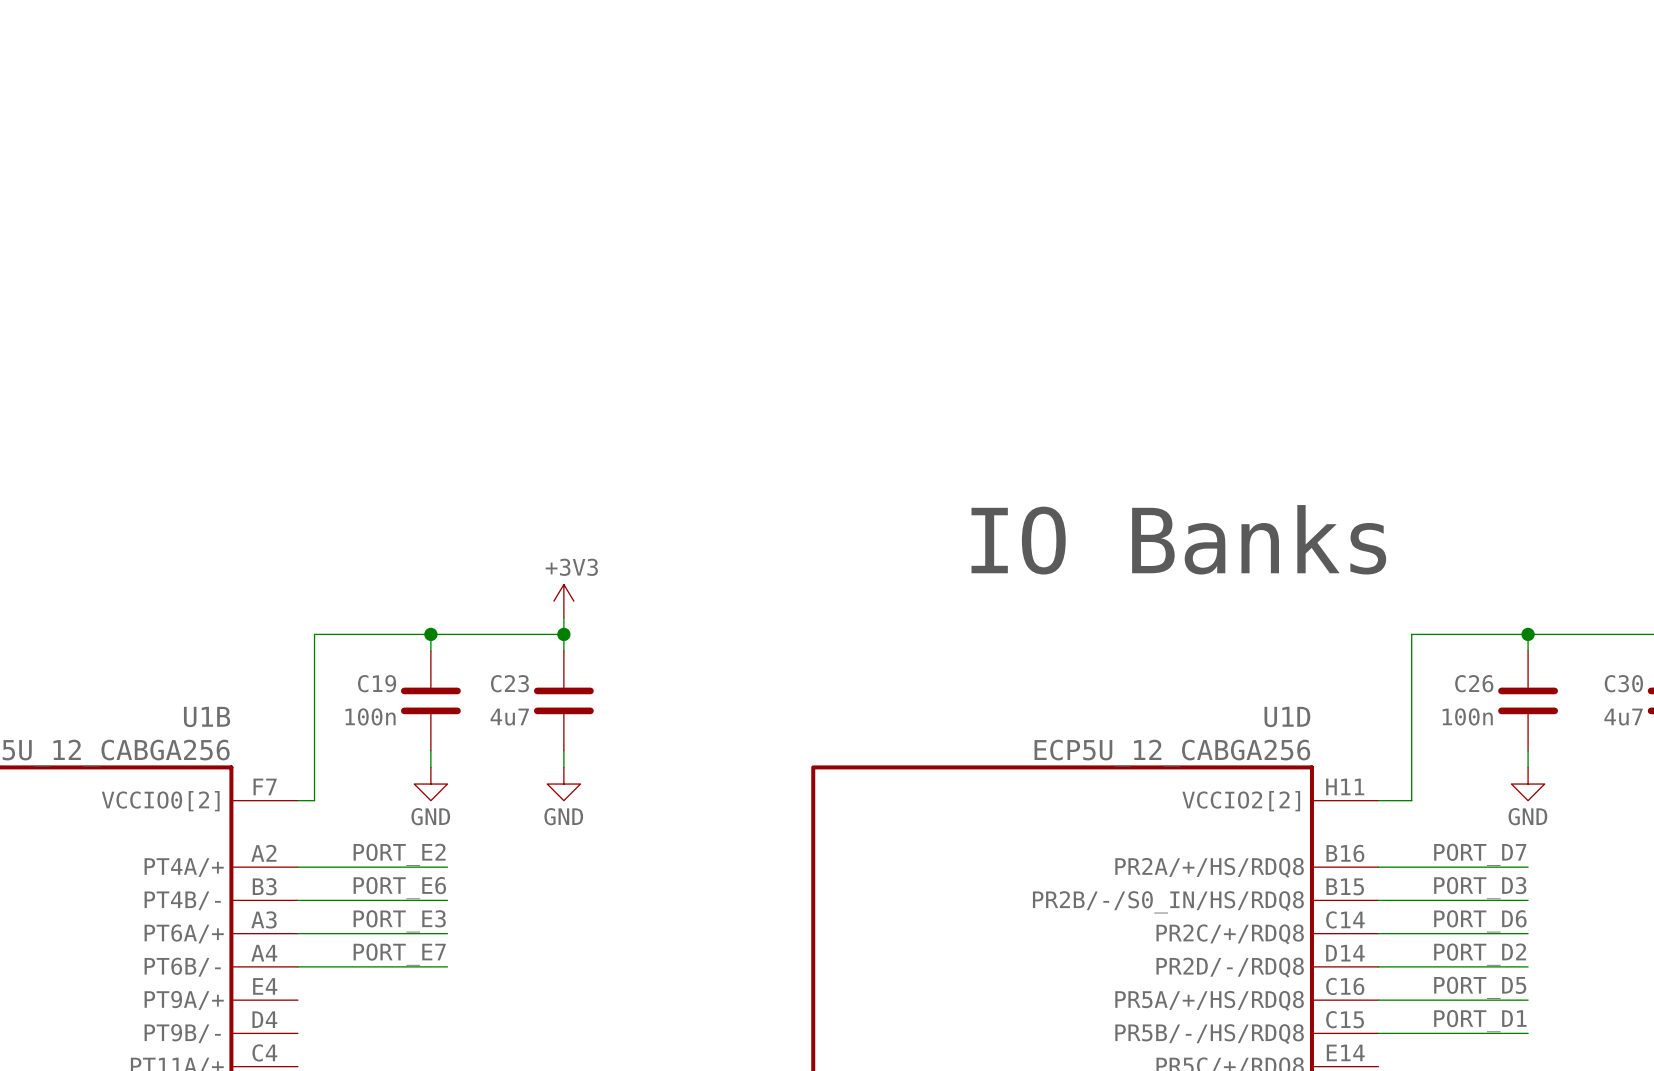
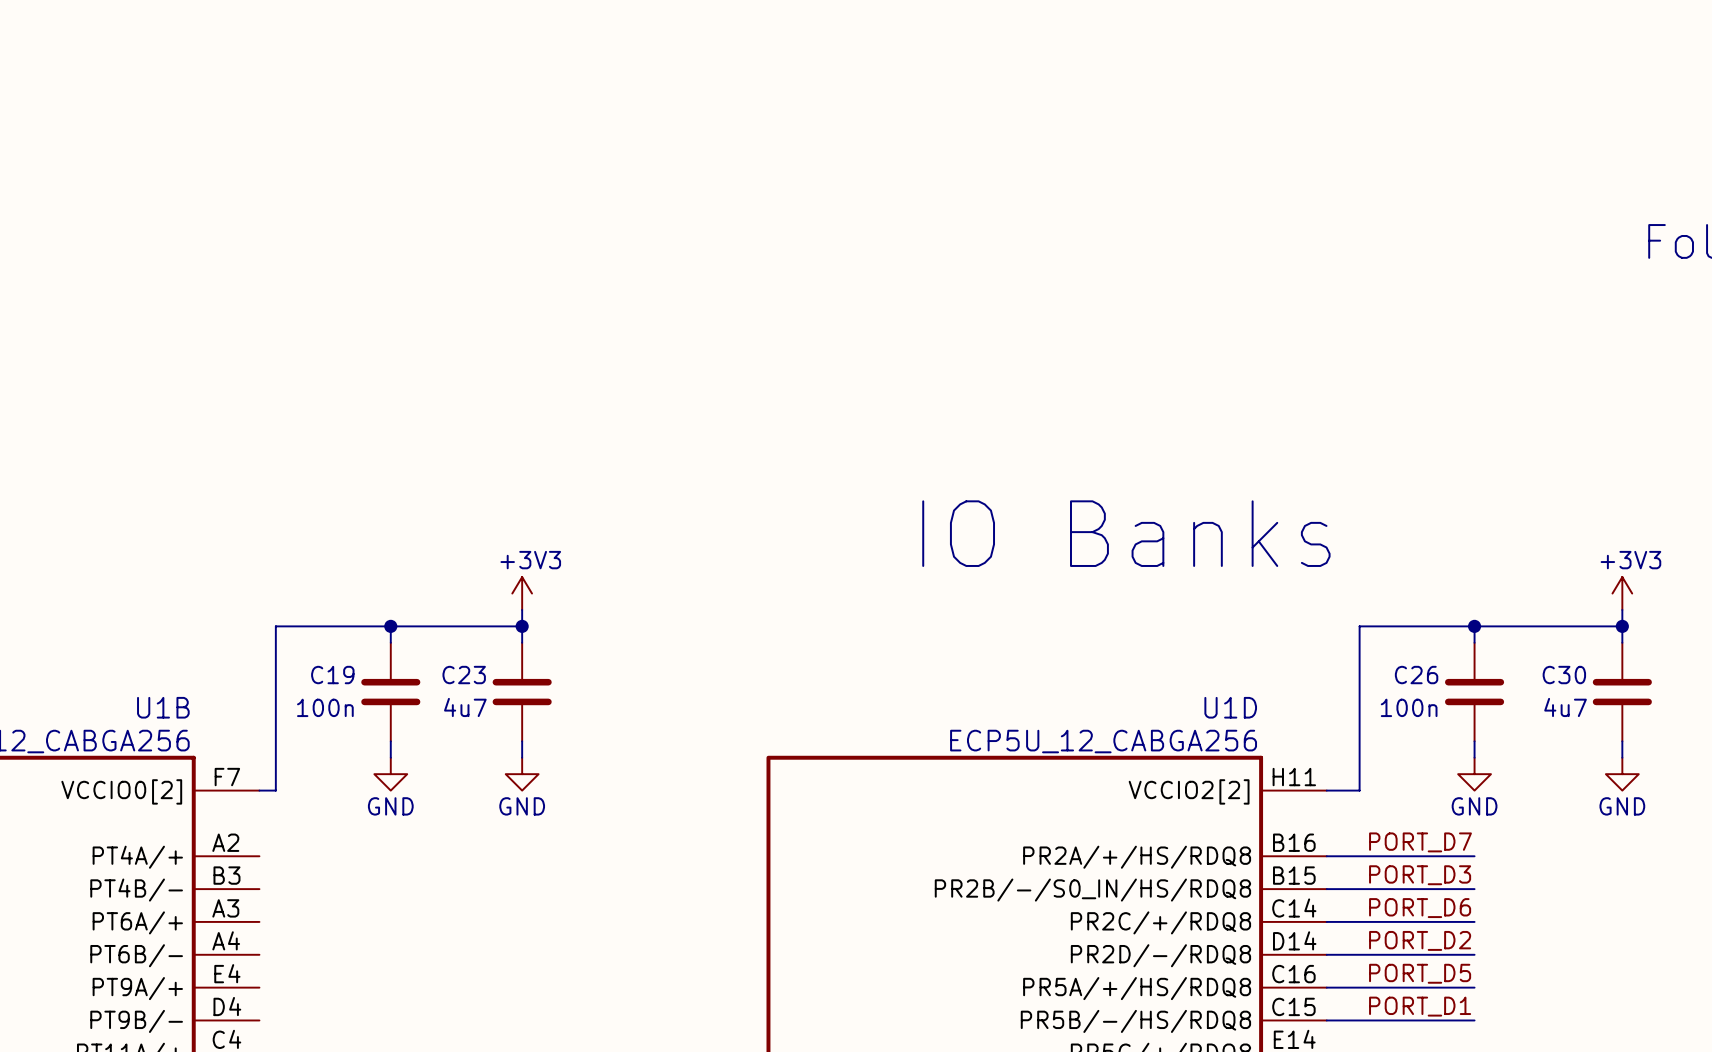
label: PORT_E2 (399, 854) -> none
wire: (297, 867) (447, 867) -> none
label: PORT_E6 (399, 888) -> none
wire: (297, 900) (447, 900) -> none
label: PORT_E3 (399, 921) -> none
wire: (297, 933) (447, 933) -> none
label: PORT_E7 (399, 954) -> none
wire: (297, 966) (447, 966) -> none

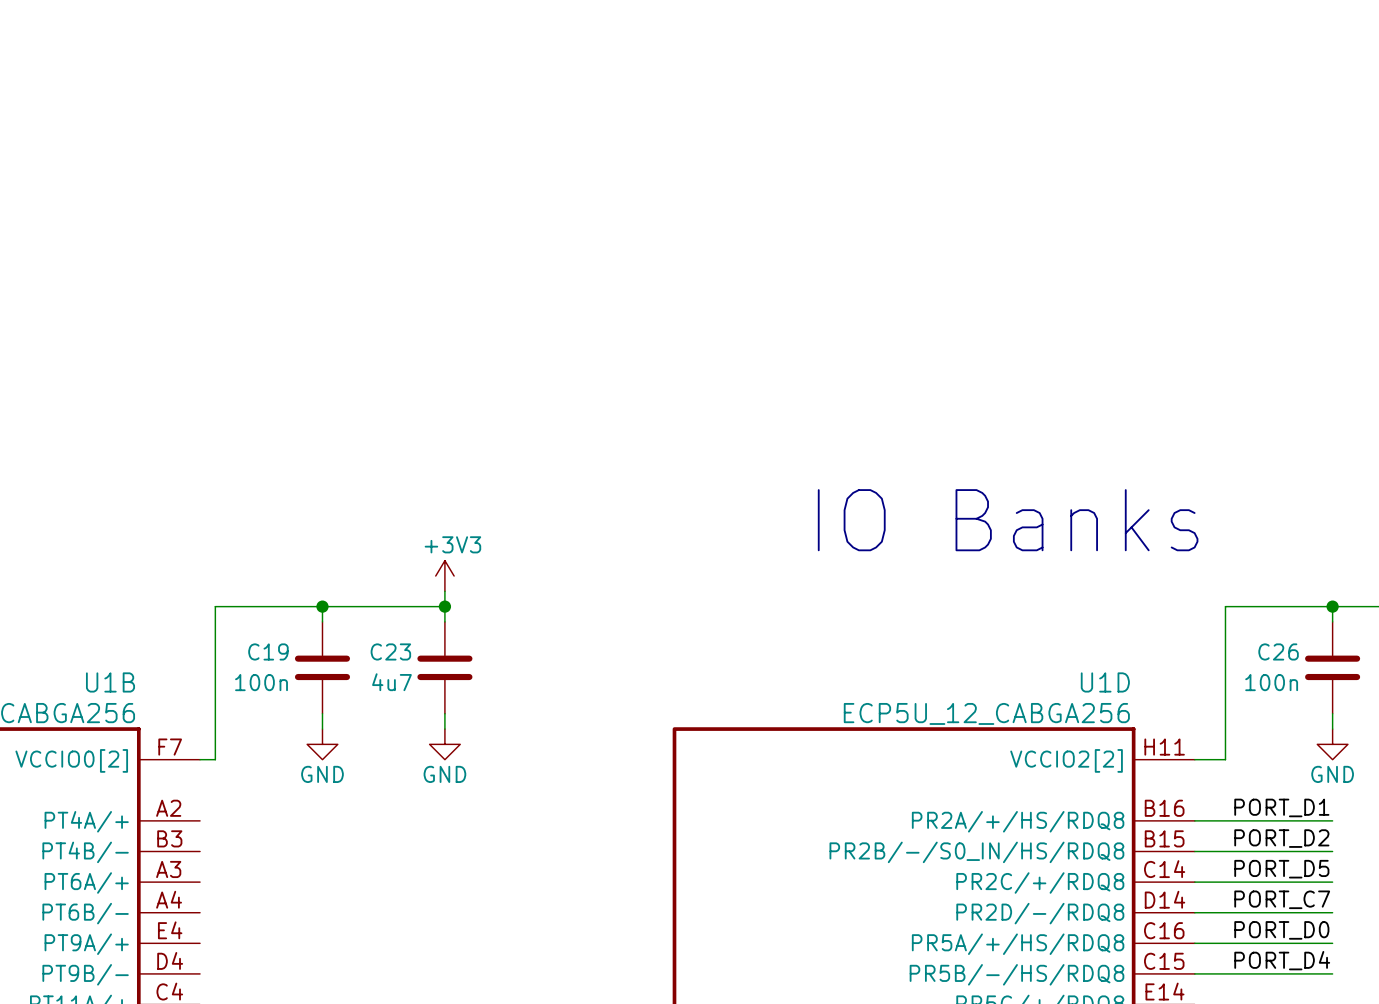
label: PORT_D7 (1420, 842) -> PORT_D1 (1281, 807)
label: PORT_D3 (1420, 875) -> PORT_D2 (1281, 838)
label: PORT_D6 (1420, 908) -> PORT_D5 (1281, 869)
label: PORT_D2 (1420, 940) -> PORT_C7 (1282, 899)
label: PORT_D5 (1420, 973) -> PORT_D0 (1281, 930)
label: PORT_D1 (1420, 1006) -> PORT_D4 (1282, 960)

